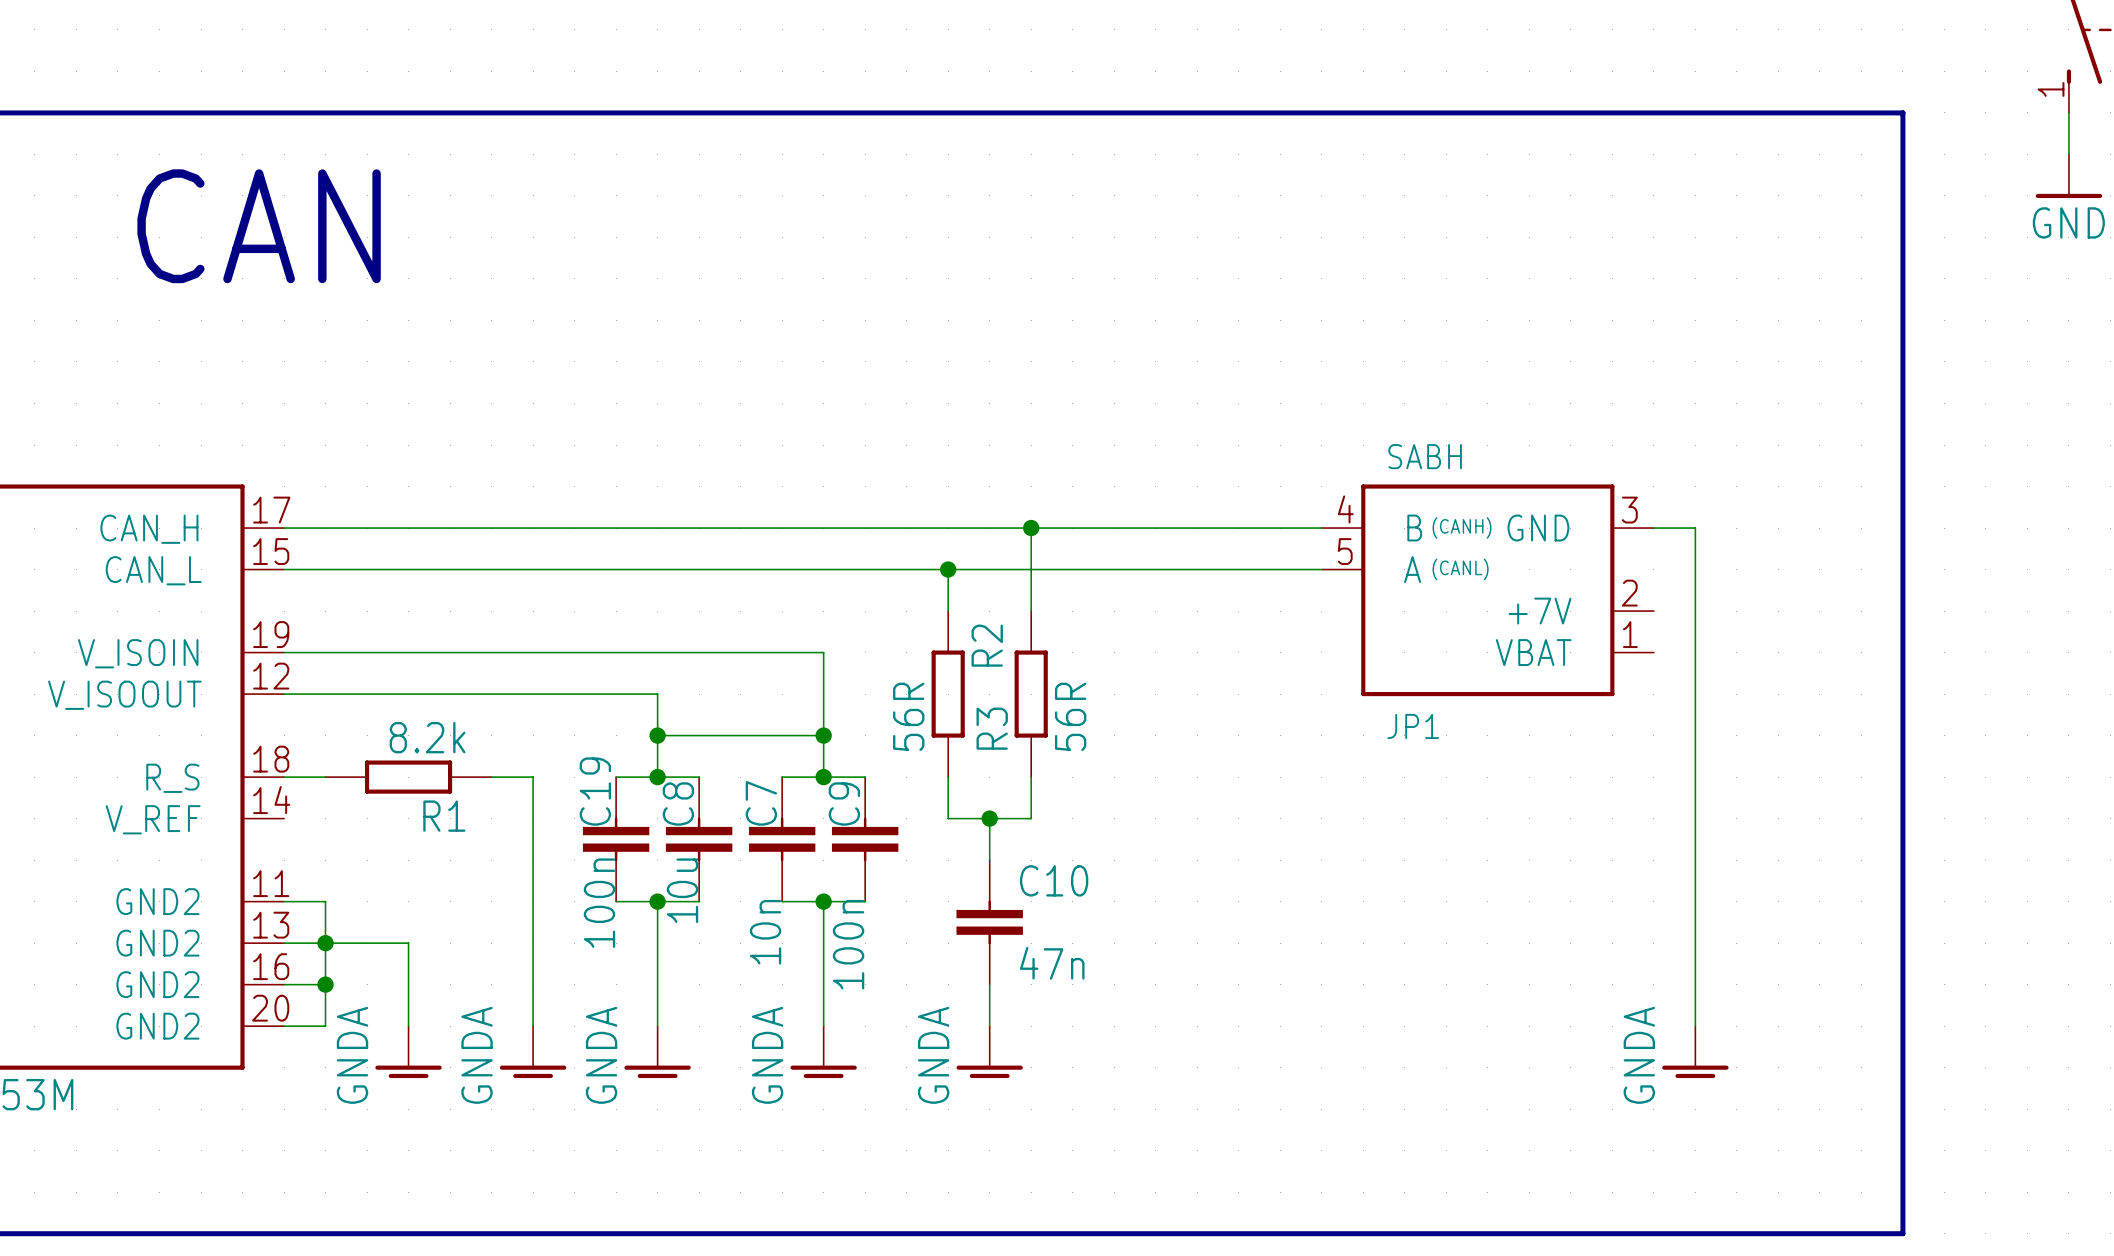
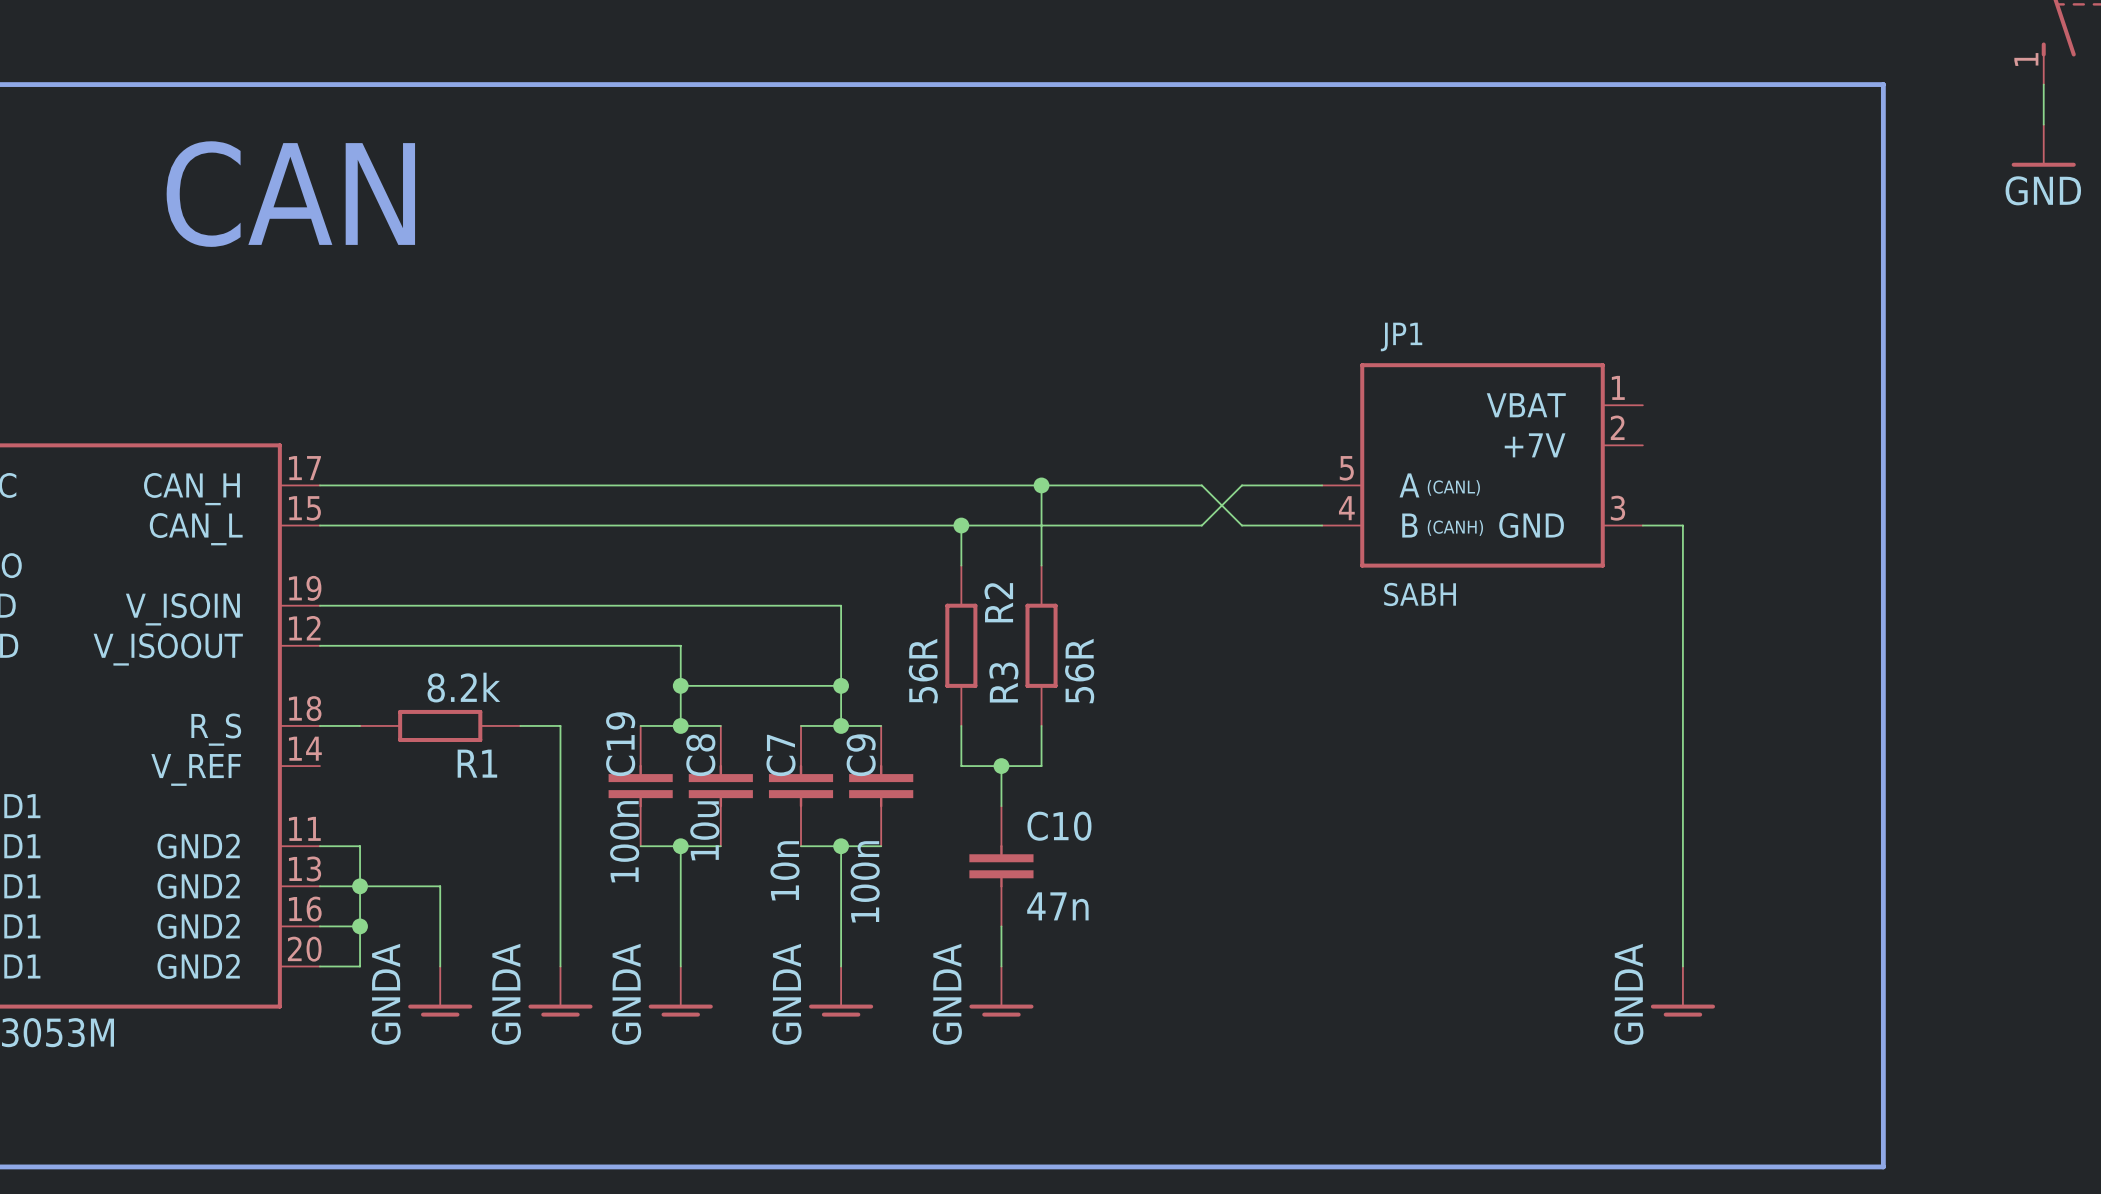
JP1 value position: SABH (1425, 456) -> SABH (1420, 594)
JP1 symbol: [1321, 484, 1654, 697] -> [1322, 363, 1643, 568]
wire: (1197, 528) (1238, 528) -> (1201, 485) (1241, 525)
wire: (1653, 528) (1695, 528) (1695, 569) -> (1642, 525) (1682, 525)
wire: (1197, 569) (1238, 569) -> (1201, 525) (1241, 485)
JP1 name position: JP1 (1413, 726) -> JP1 (1401, 336)

